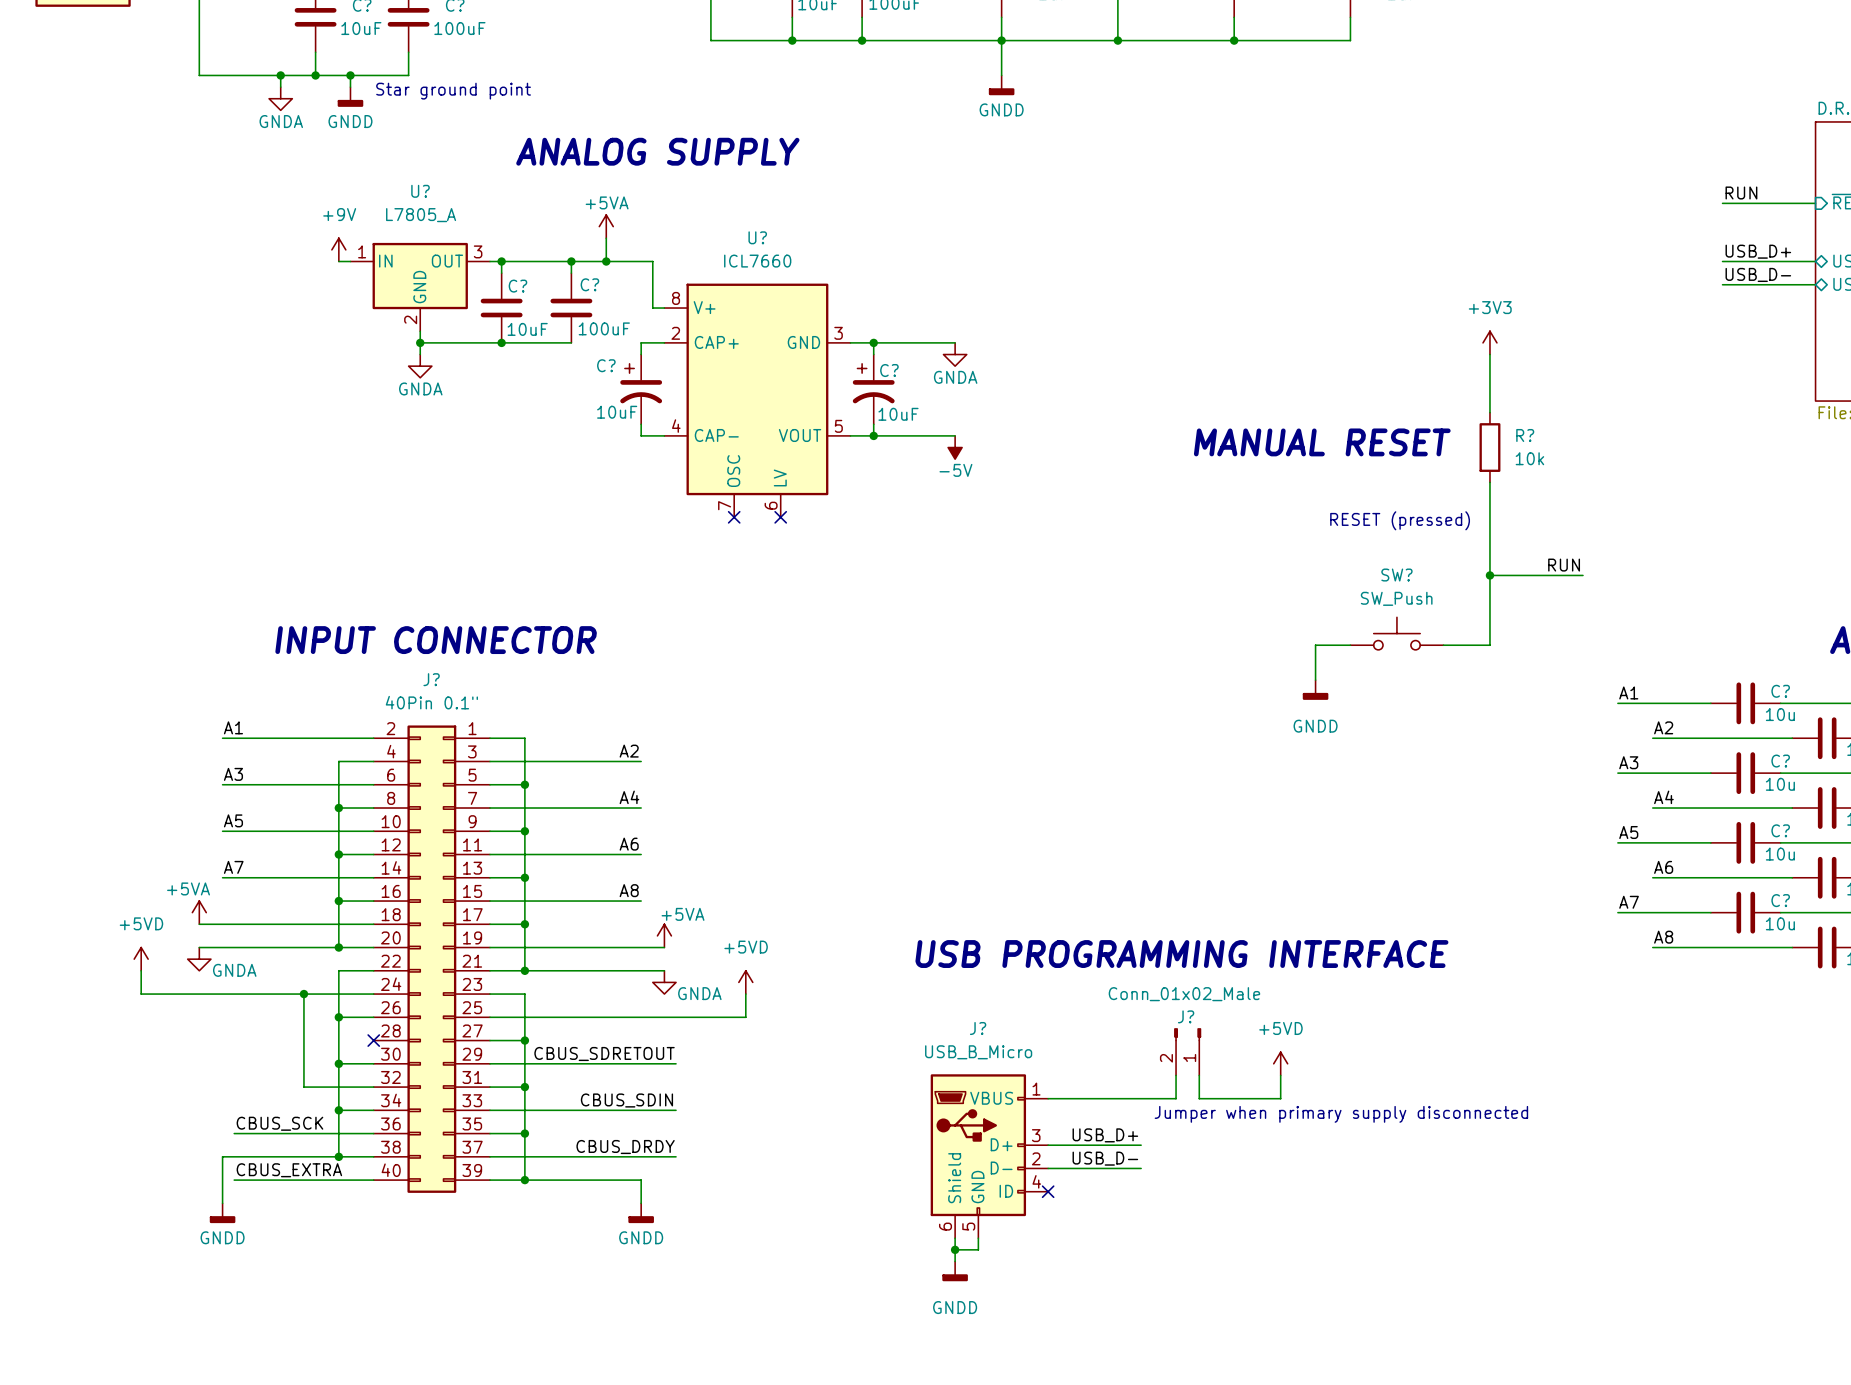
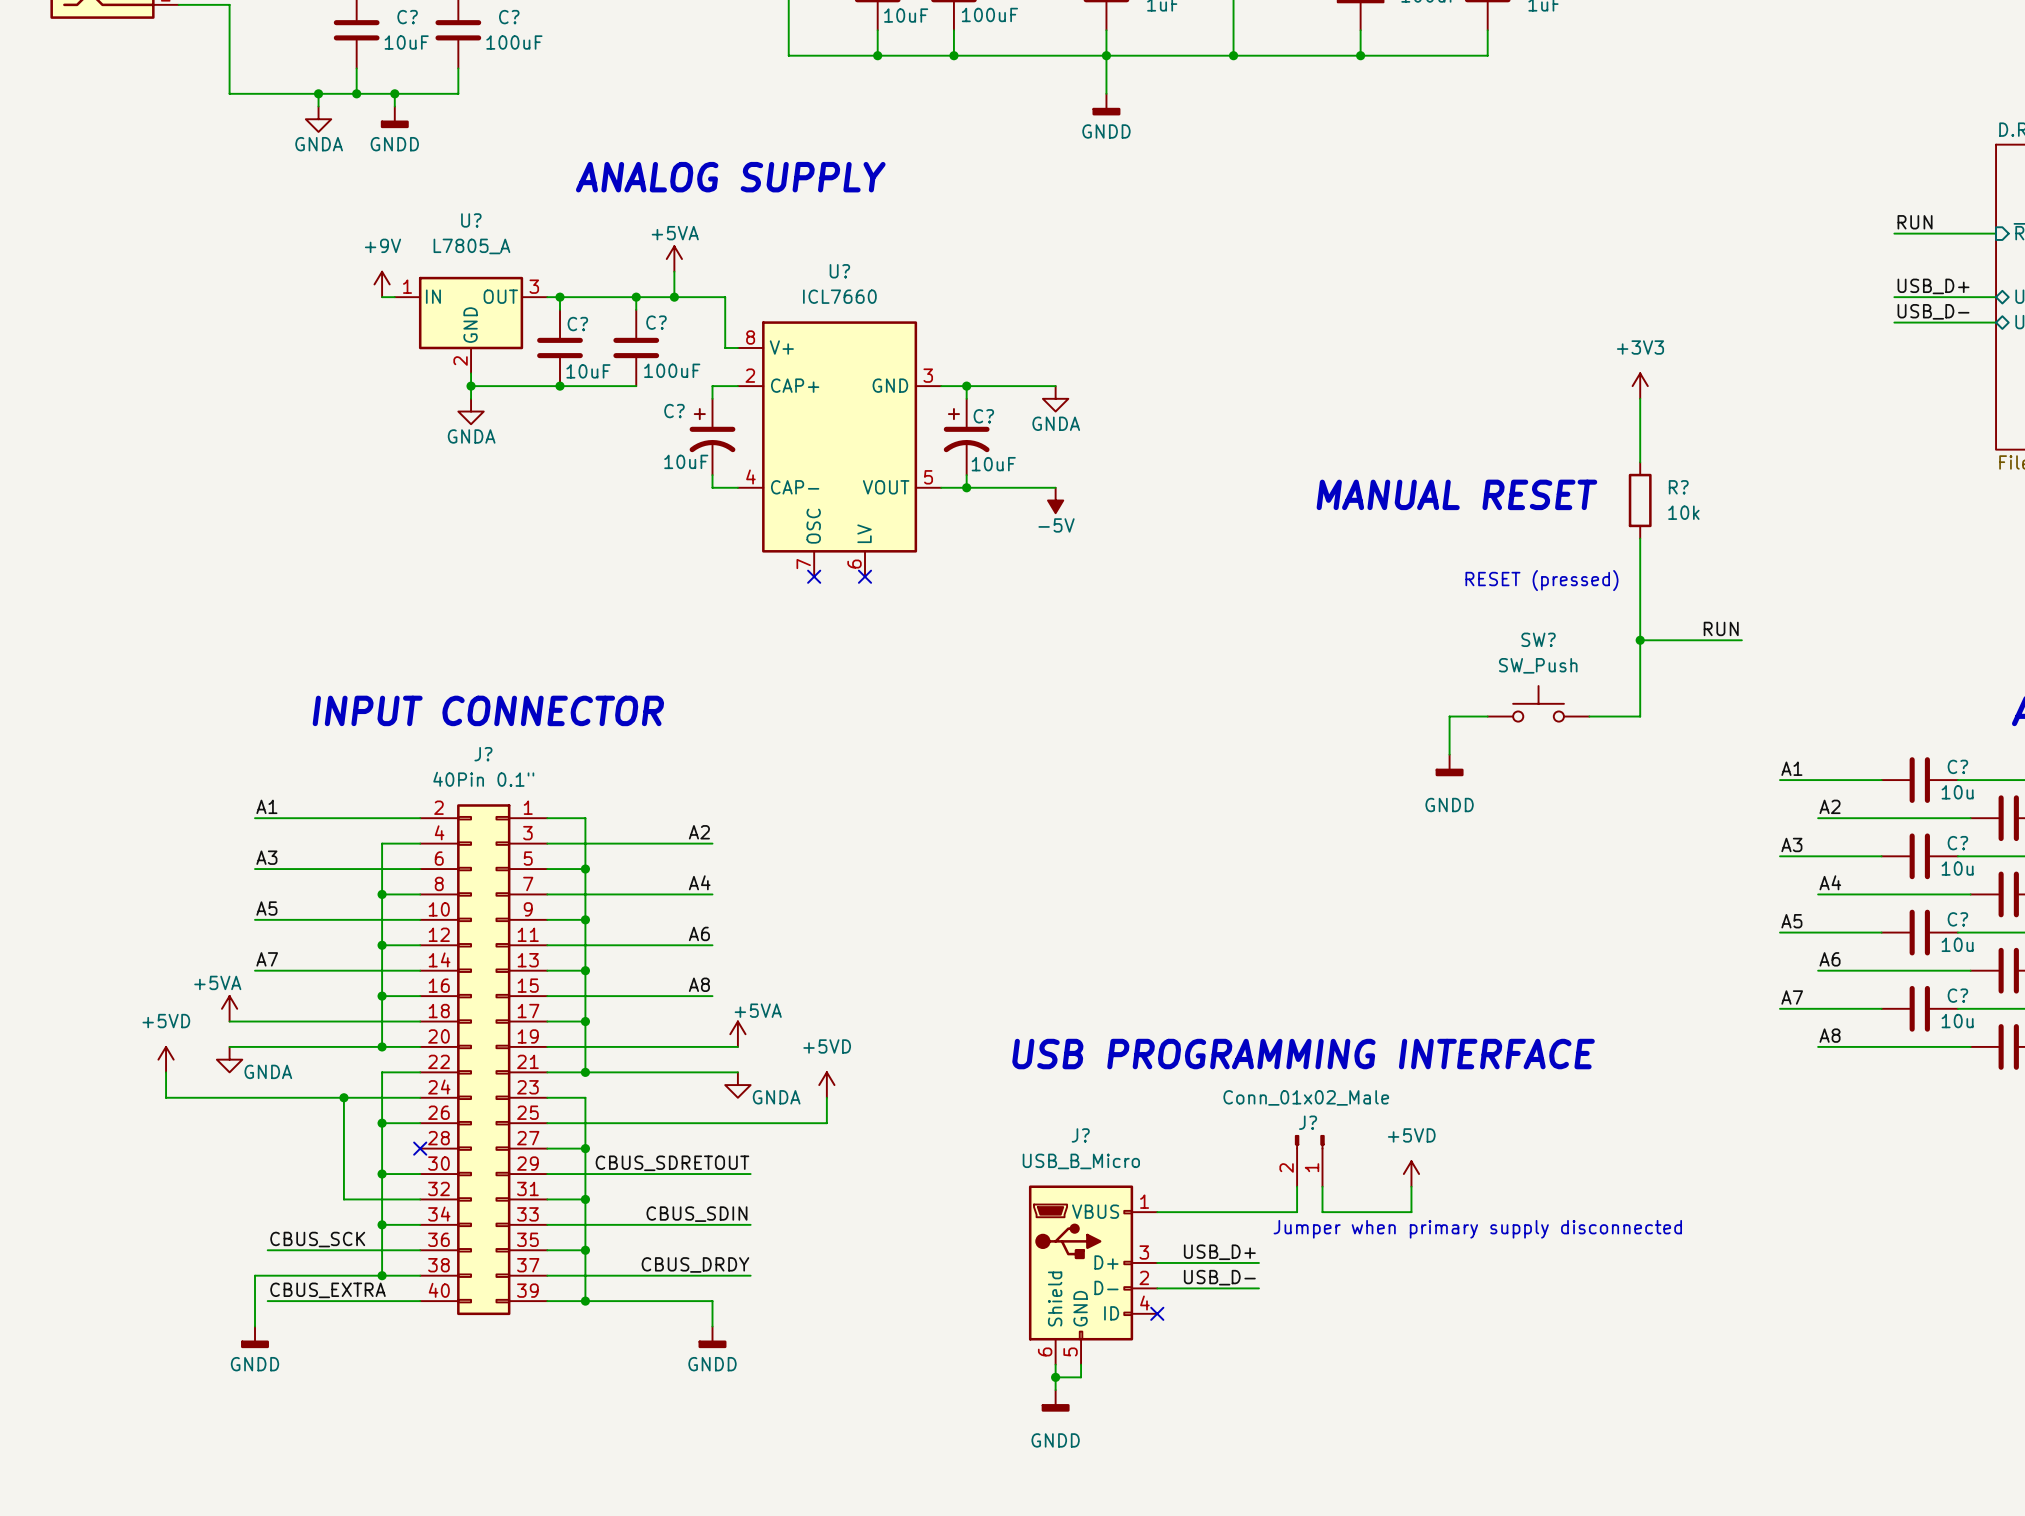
text: Star ground point (453, 91) -> none

